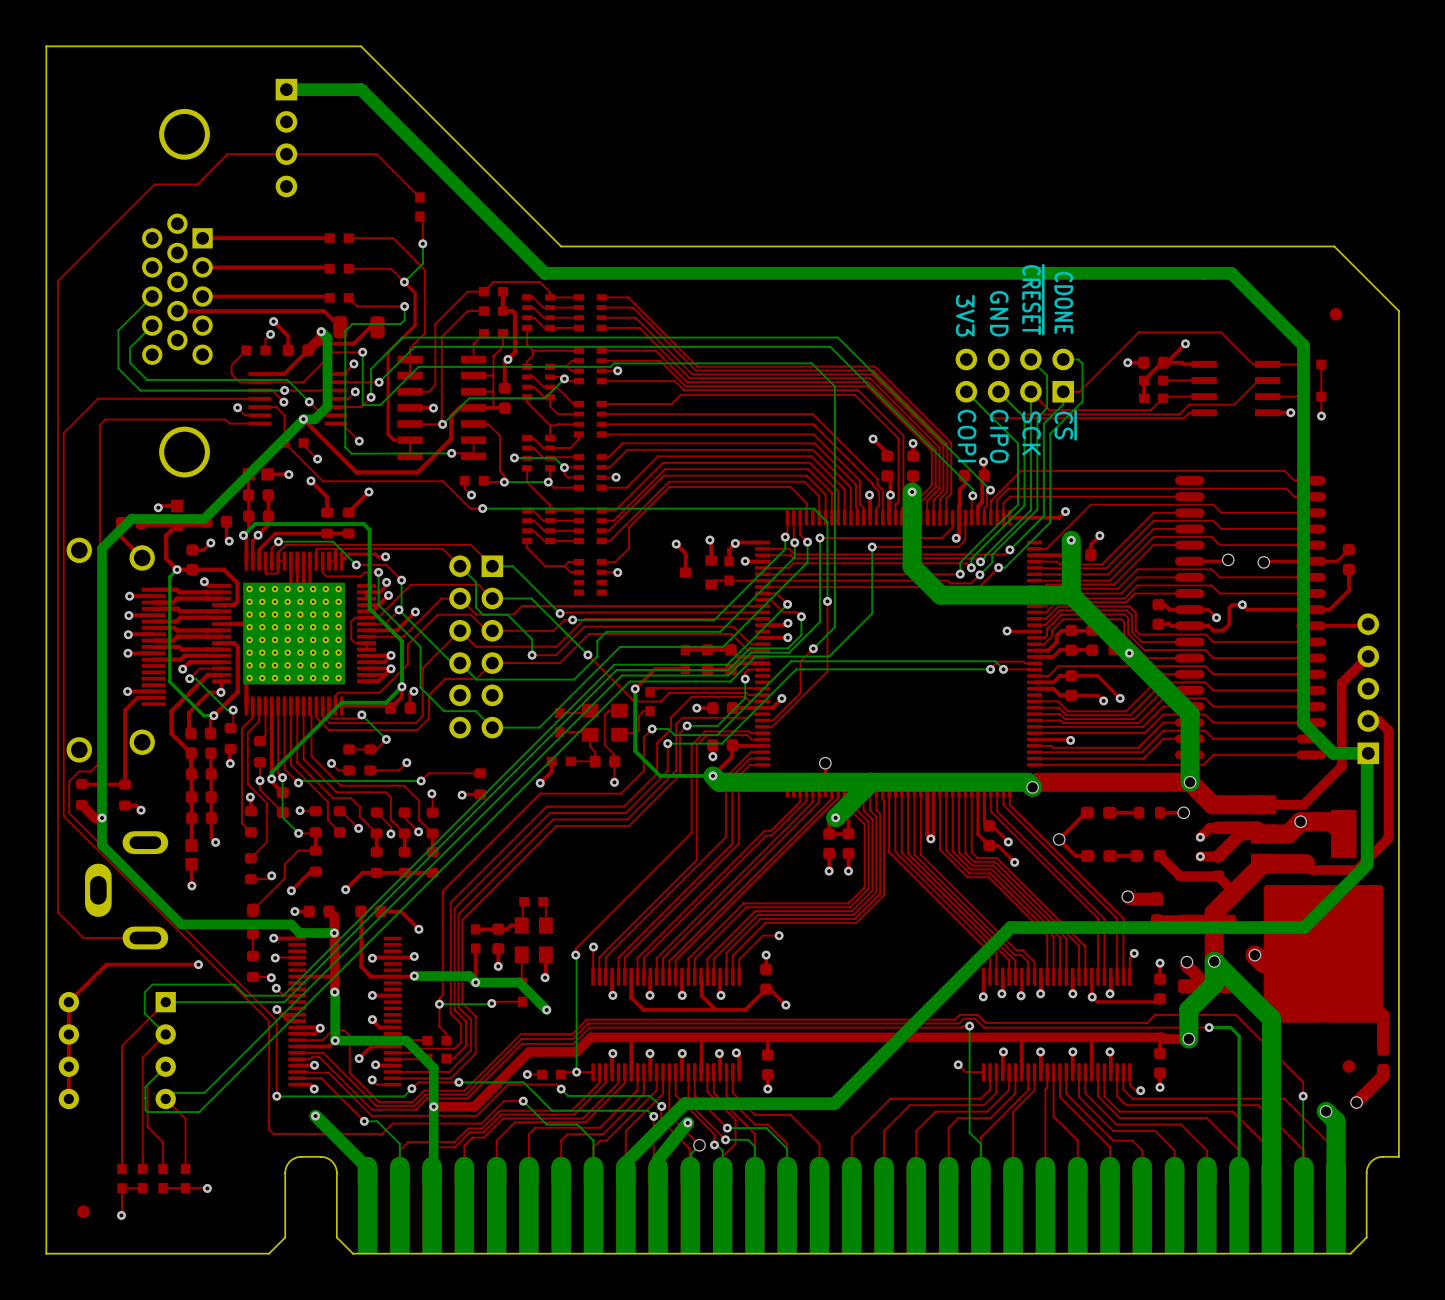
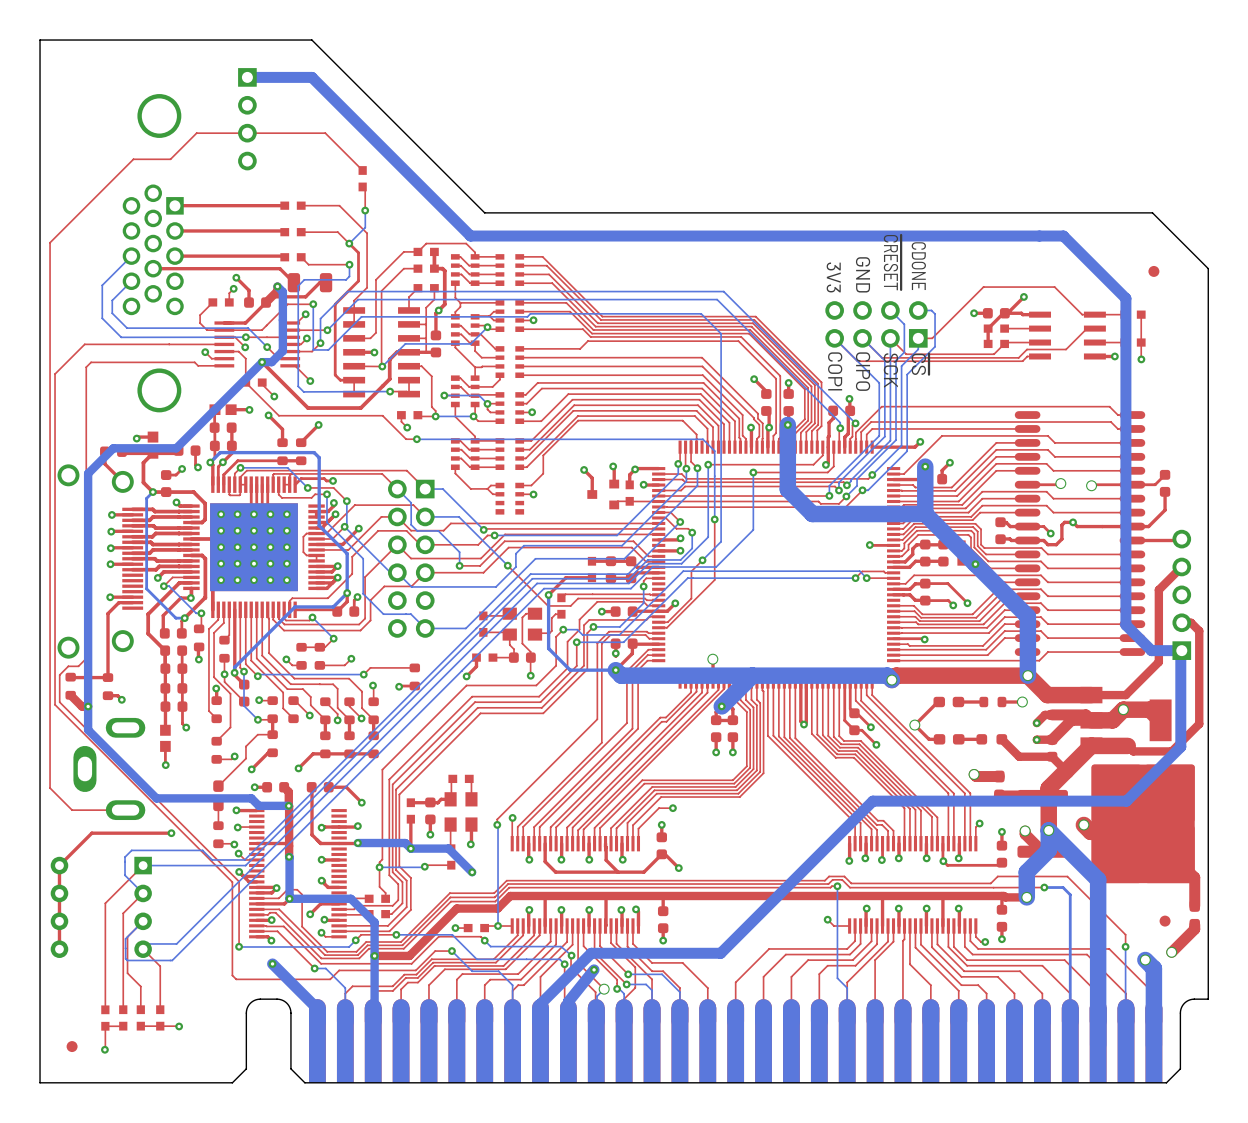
part footprint: [212, 551, 377, 716] -> [183, 476, 325, 619]

